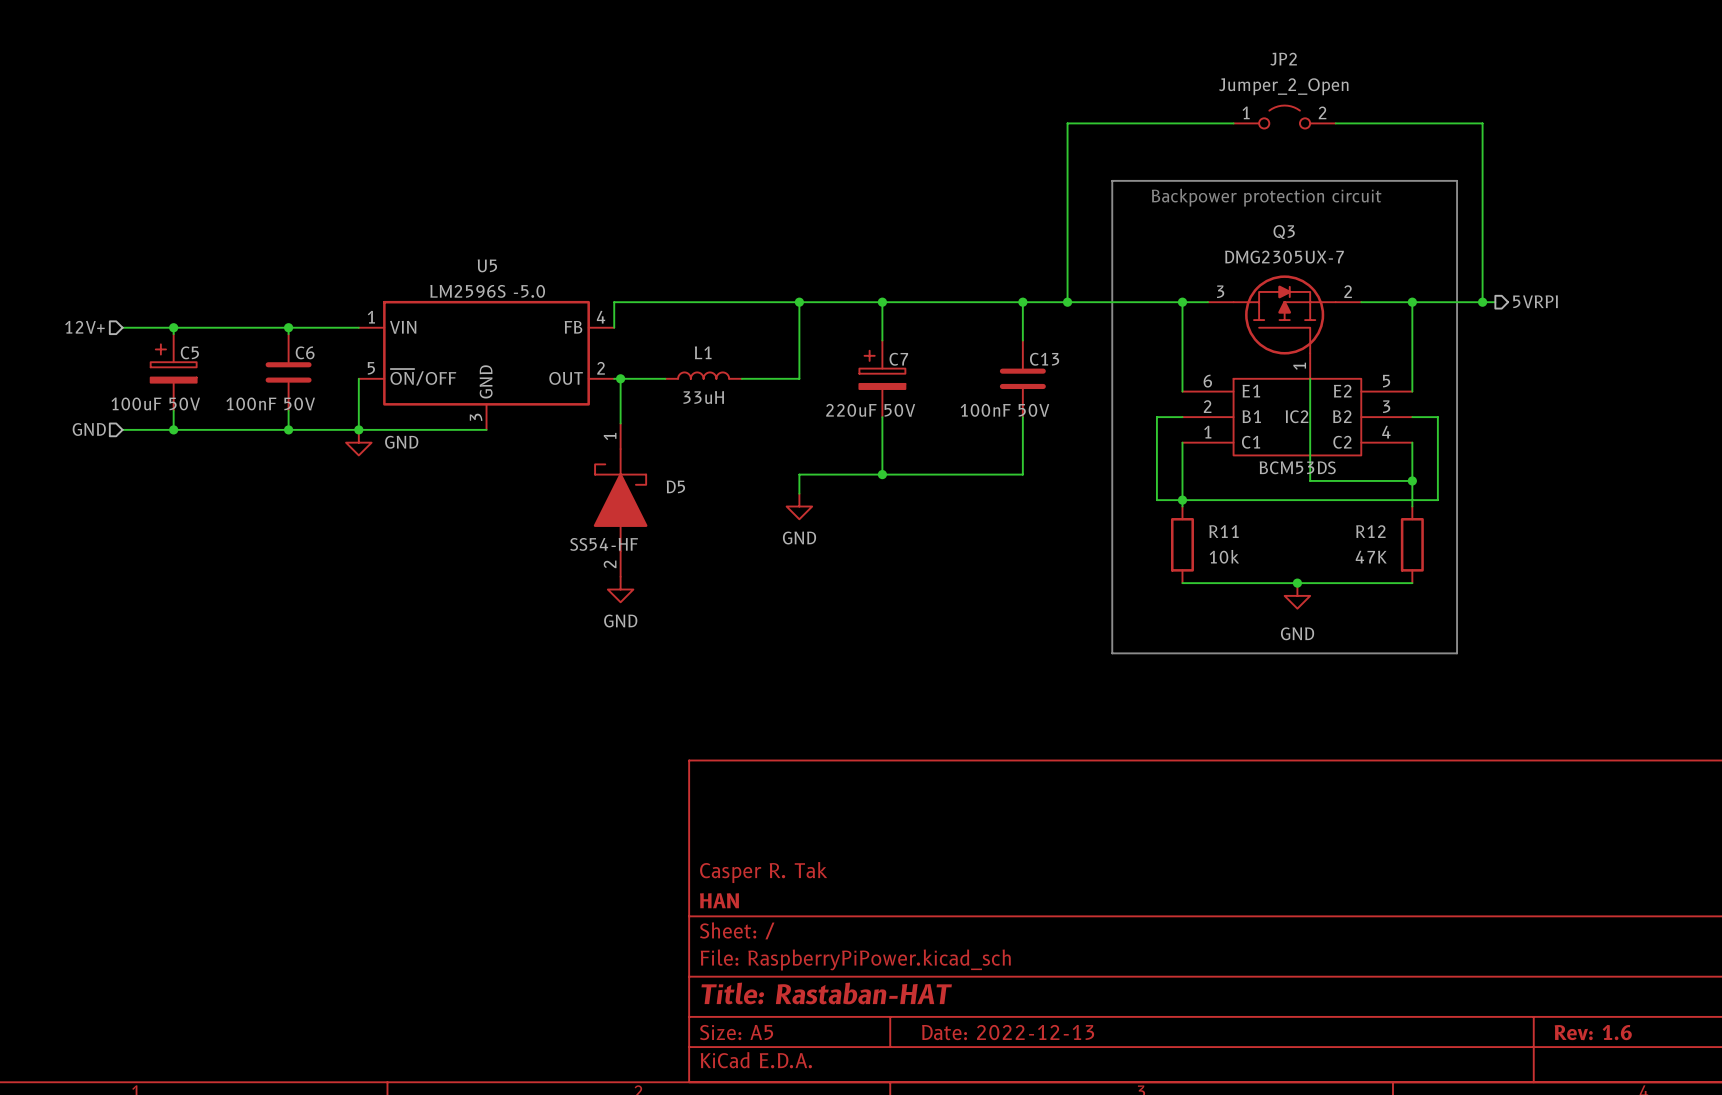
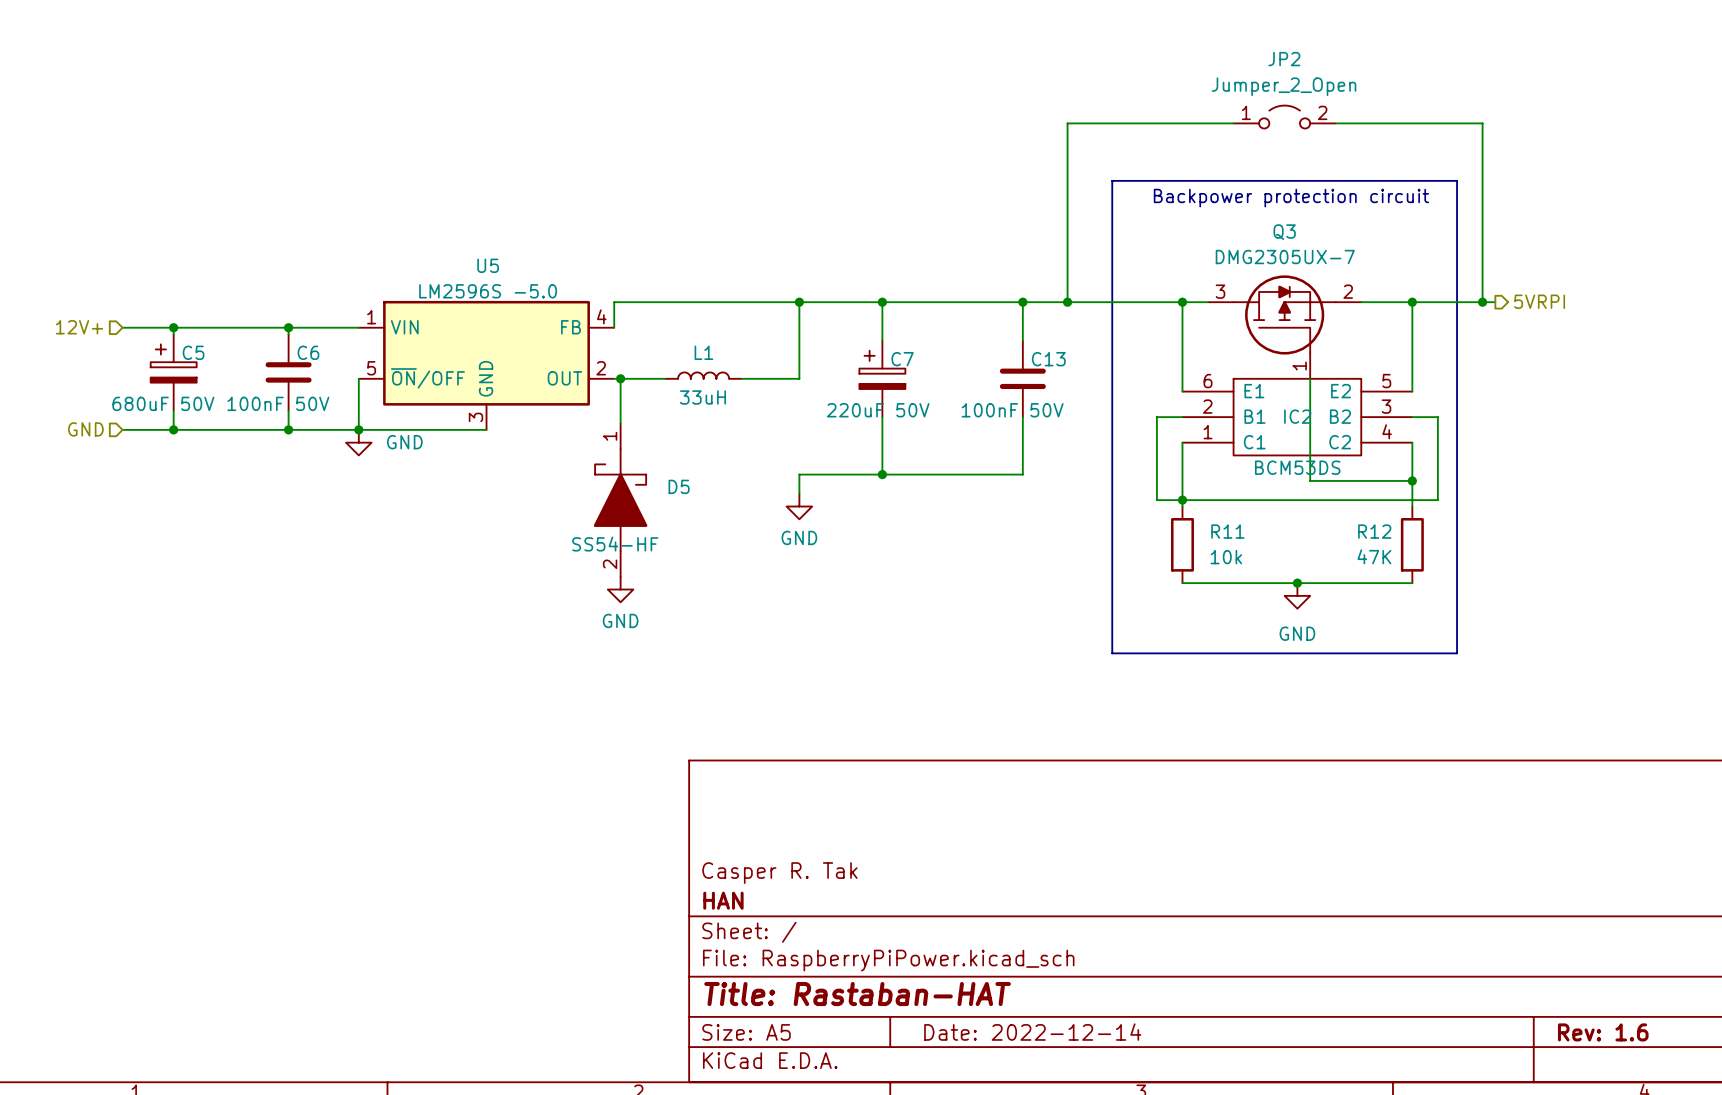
C5 value: 100uF 50V (155, 403) -> 680uF 50V (163, 403)
title block: Date: 2022-12-13 (1008, 1032) -> Date: 2022-12-14 (1032, 1032)

